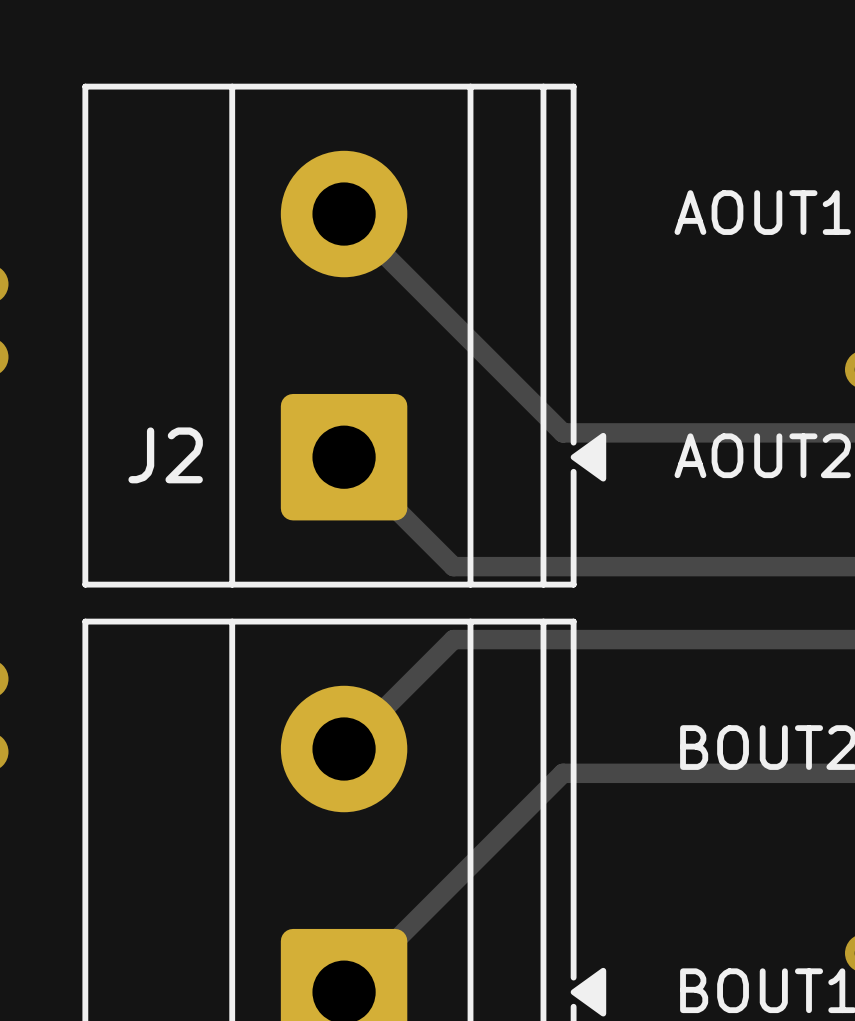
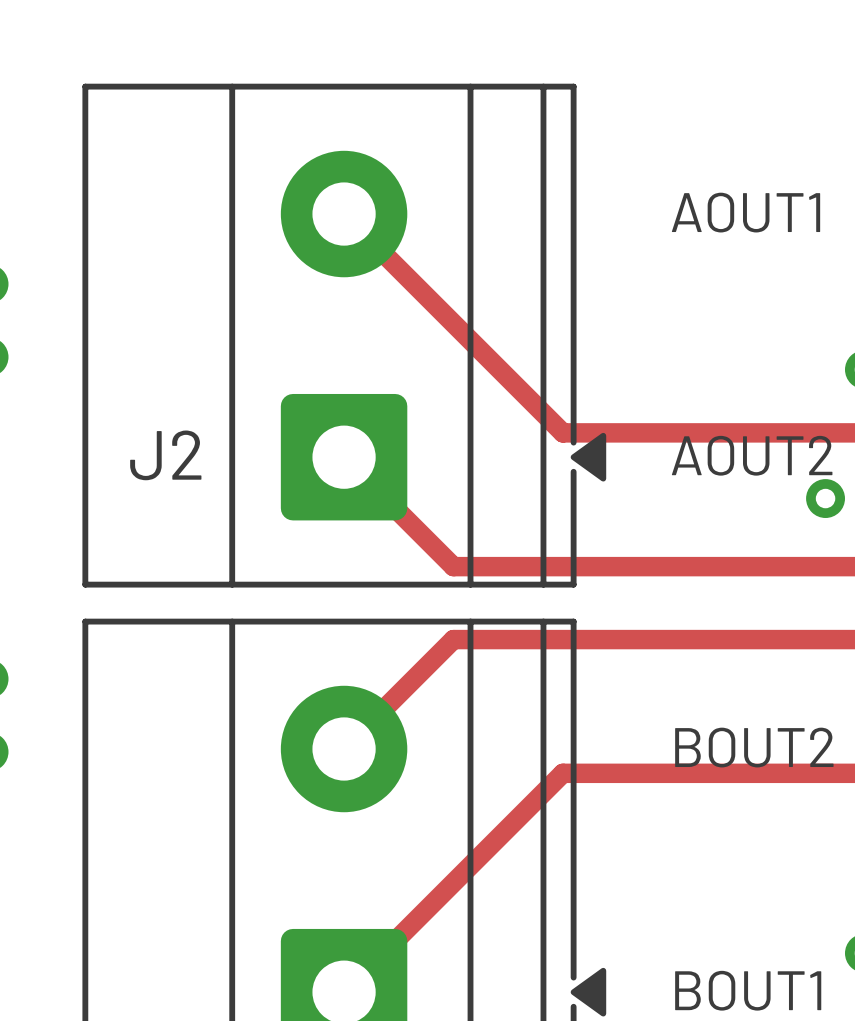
via: none -> (825, 498)

